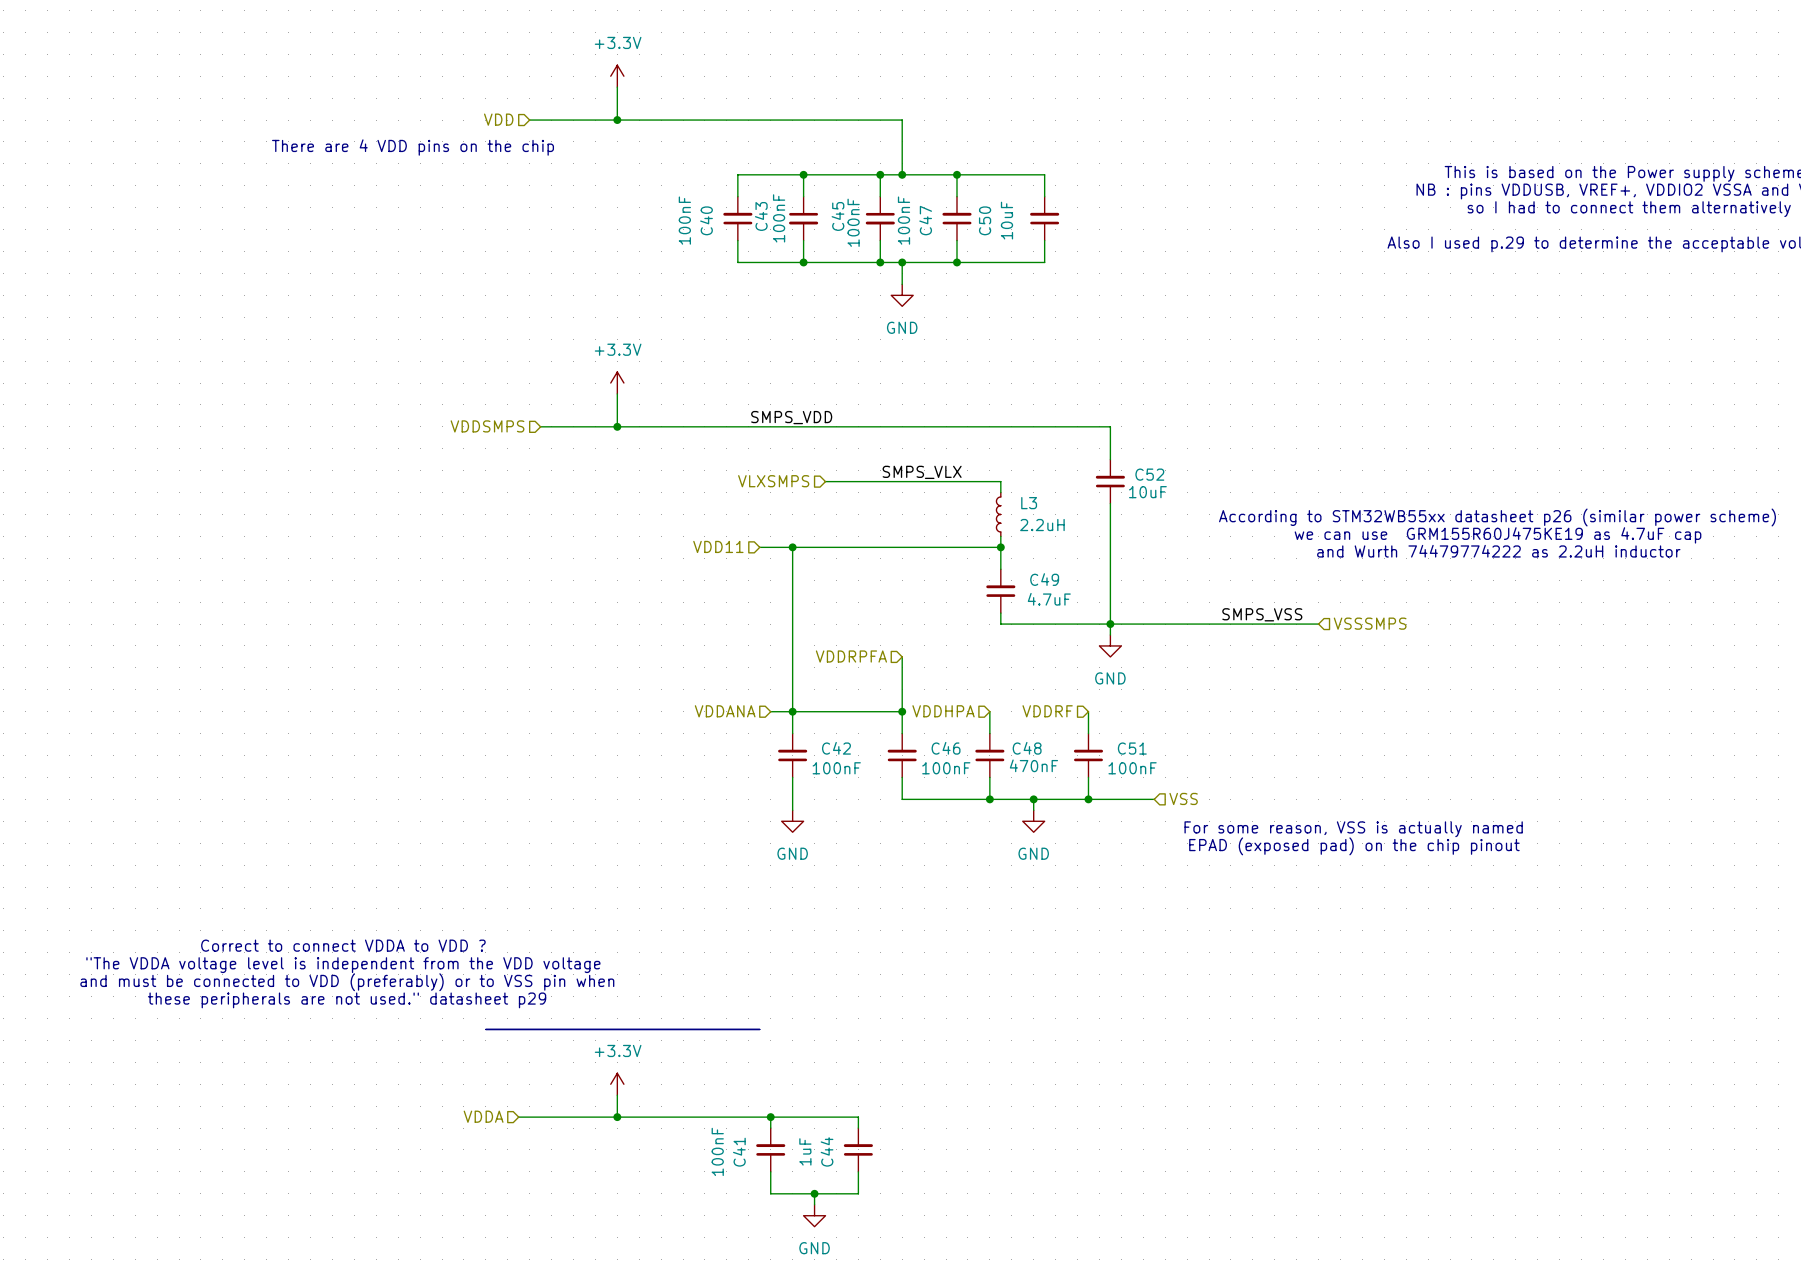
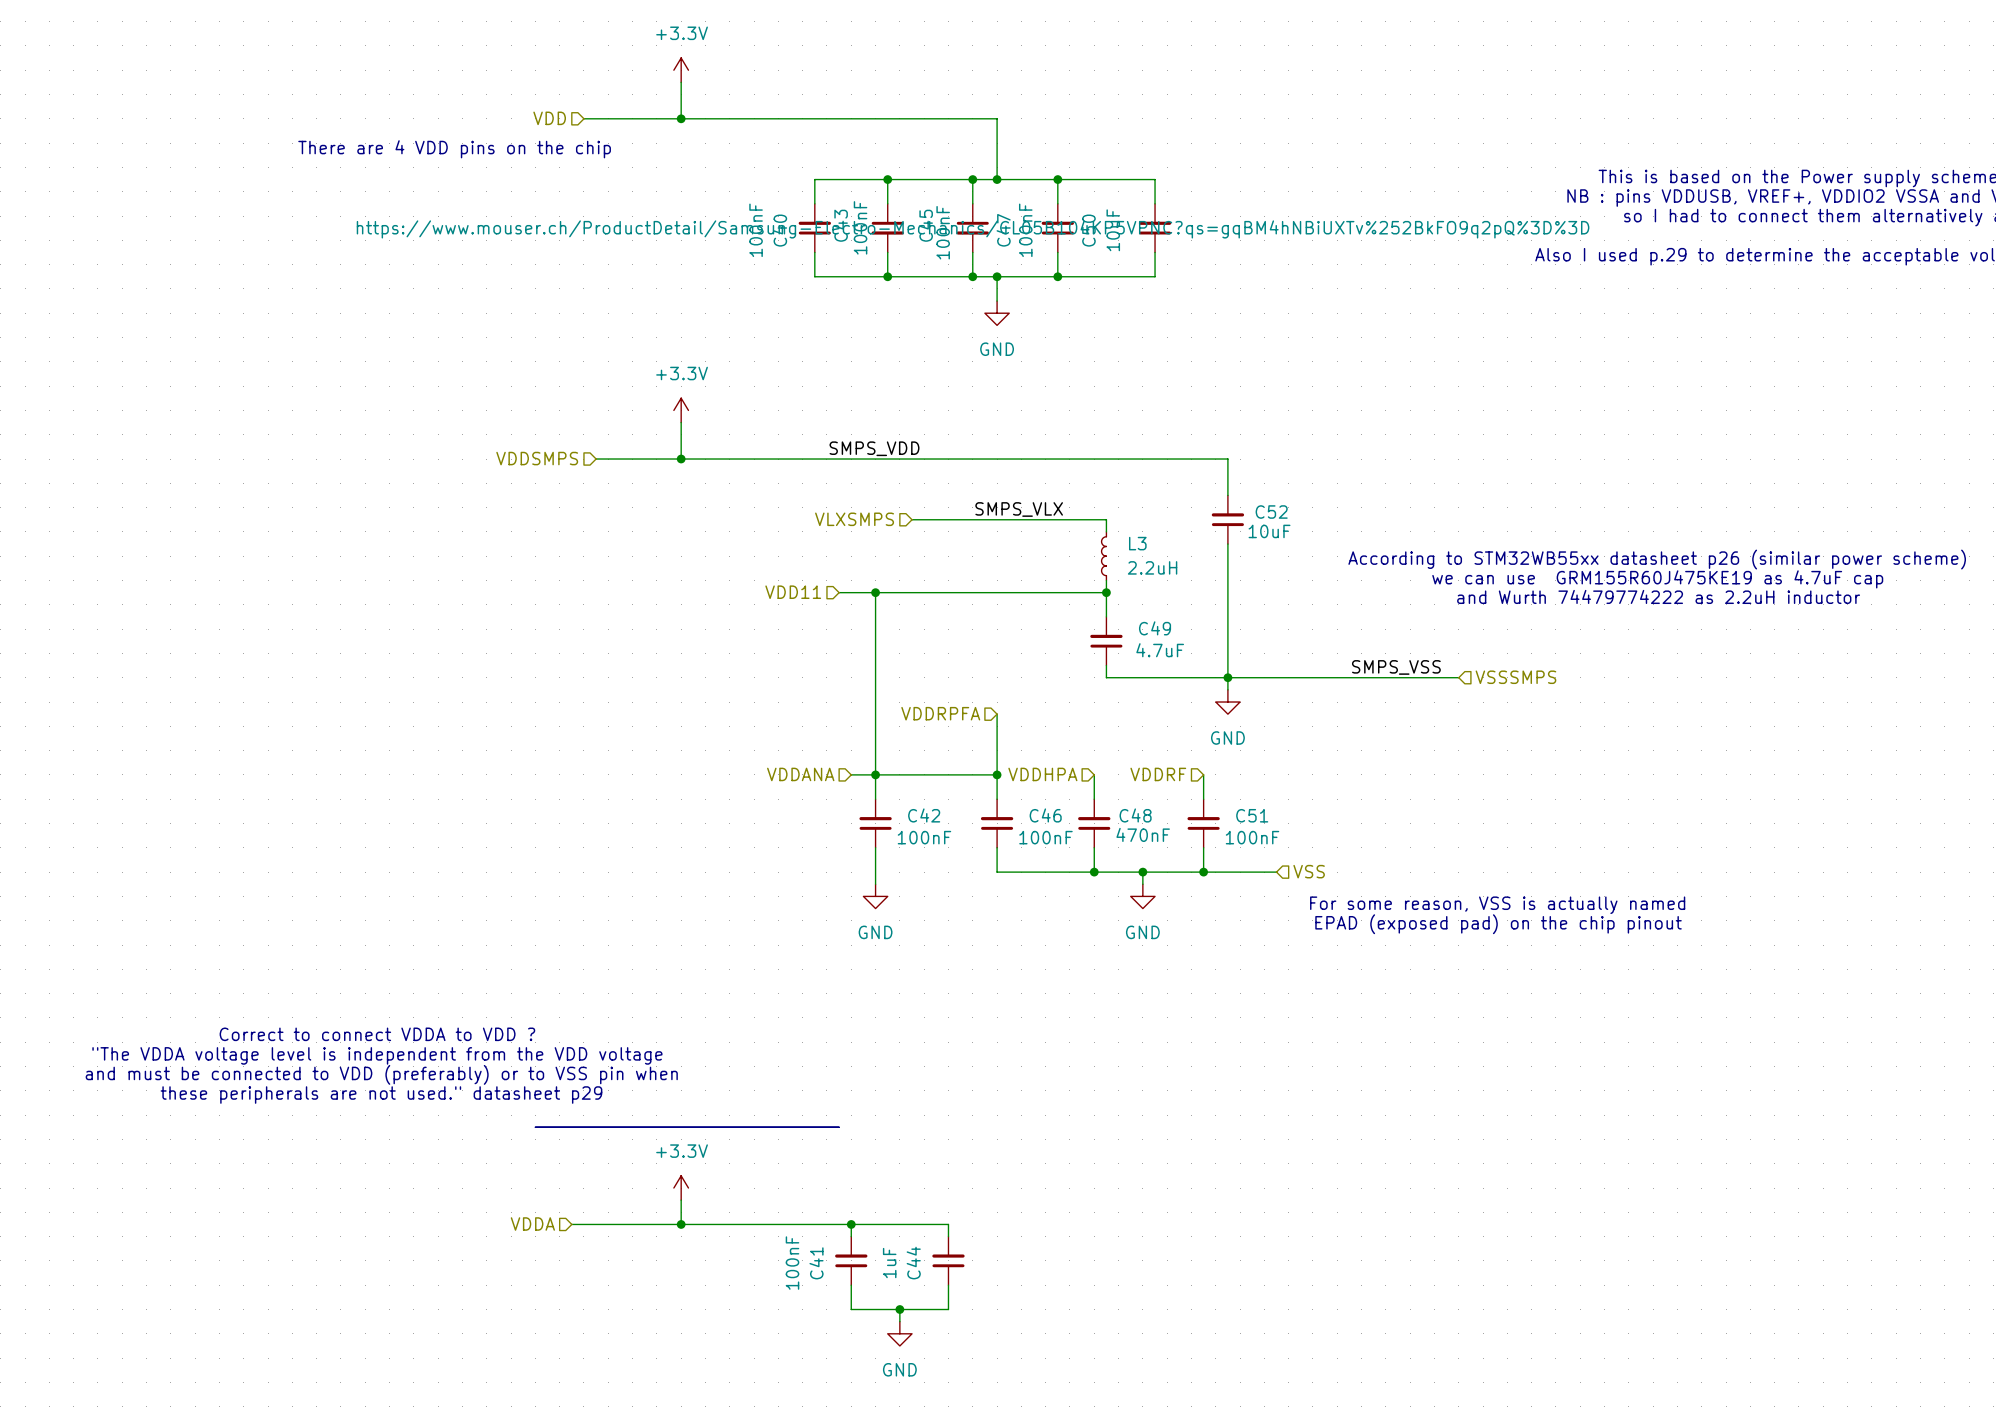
C45 text: none -> https://www.mouser.ch/ProductDetail/Samsung-Electro-Mechanics/CL05B104KP5VPNC?qs=gqBM4hNBiUXTv%252BkFO9q2pQ%3D%3D (973, 229)
C47 value position: 100nF (903, 220) -> 100nF (1025, 230)
C47 name position: C47 (925, 220) -> C47 (1003, 230)

